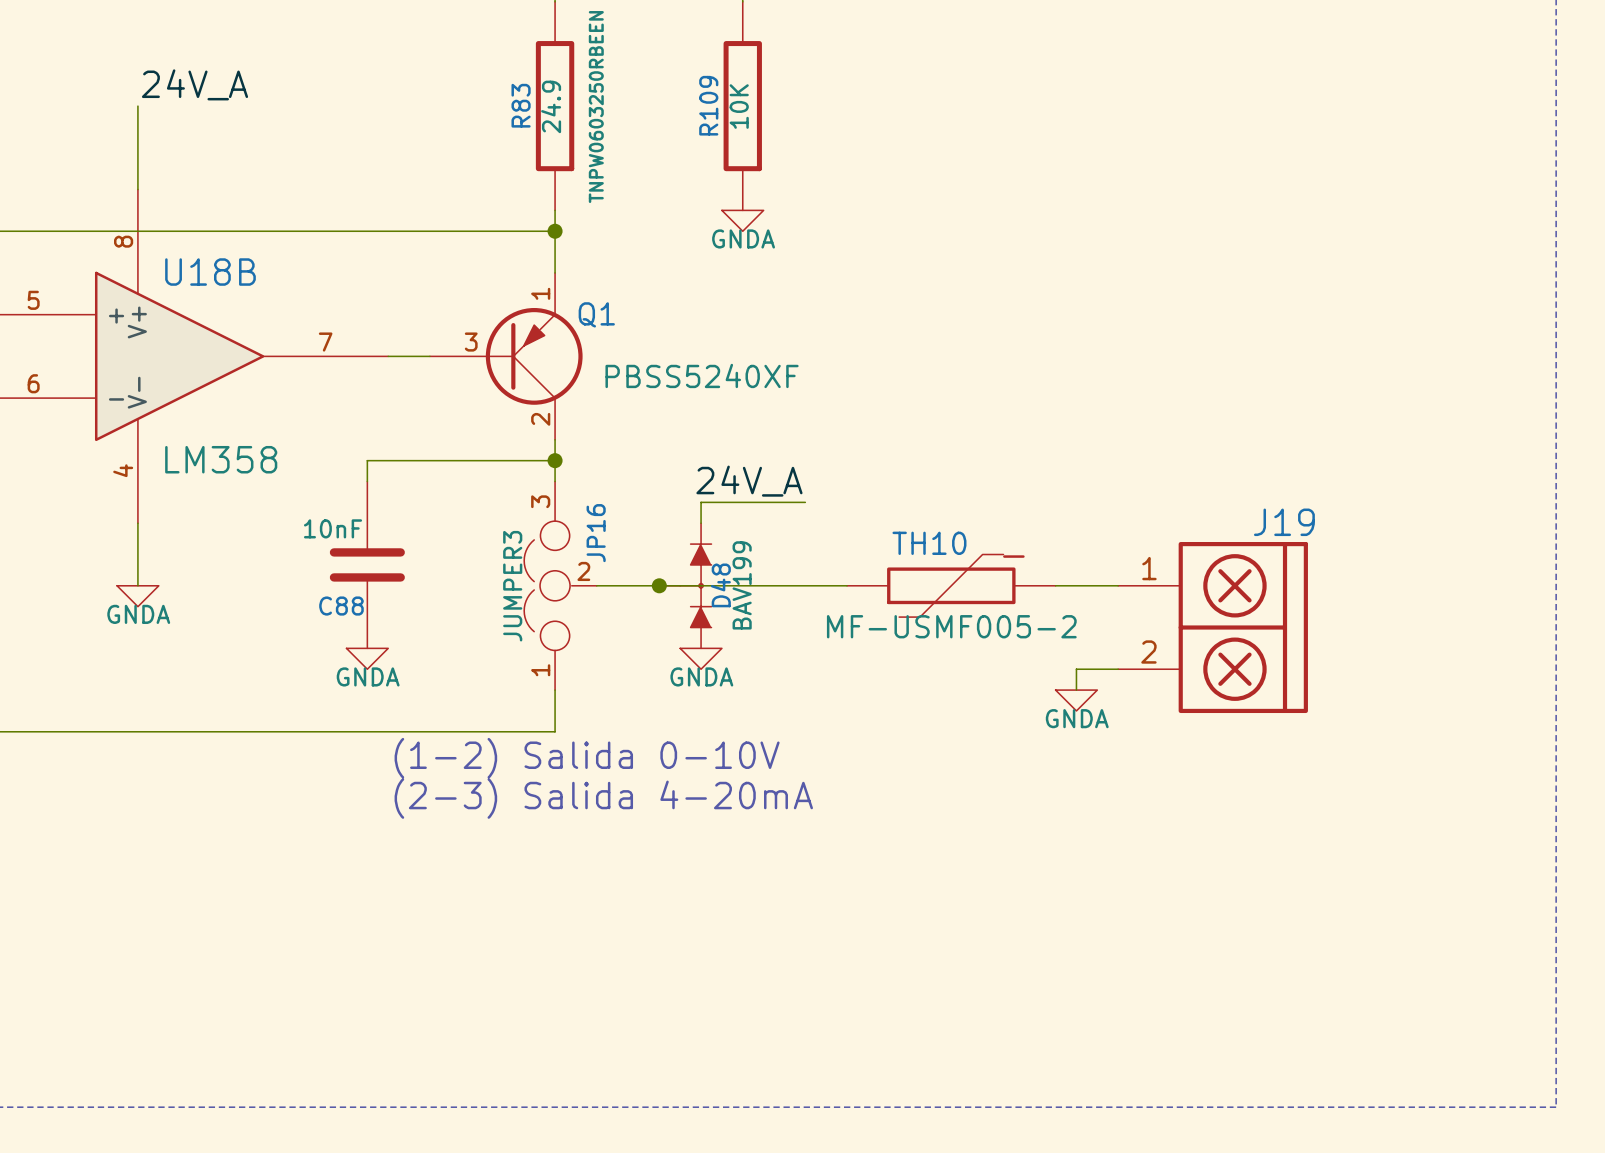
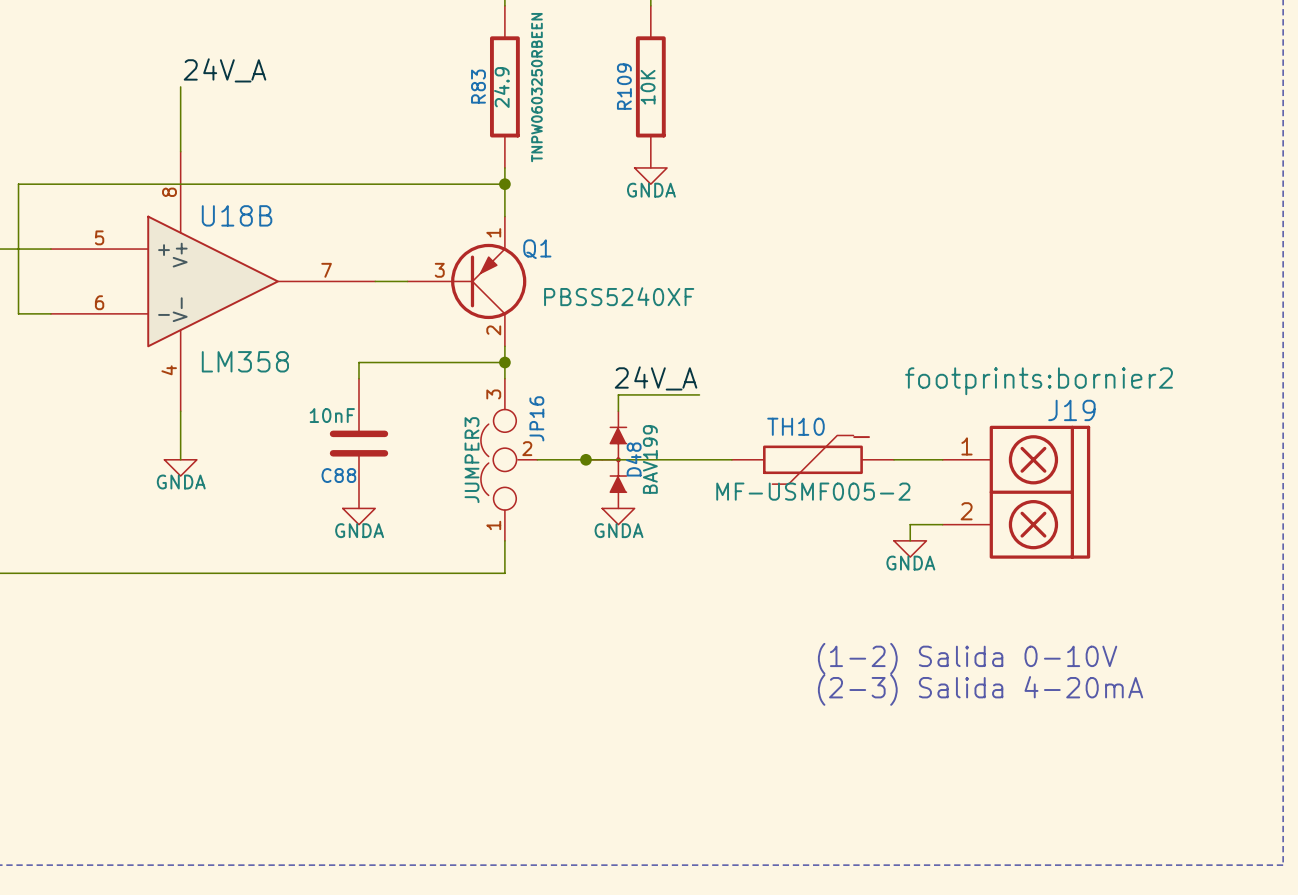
J19 text: none -> footprints:bornier2 (1039, 381)
text: (1-2) Salida 0-10V (587, 758) -> none
text: (2-3) Salida 4-20mA (603, 798) -> none
text: none -> (1-2) Salida 0-10V (967, 658)
text: none -> (2-3) Salida 4-20mA (980, 690)

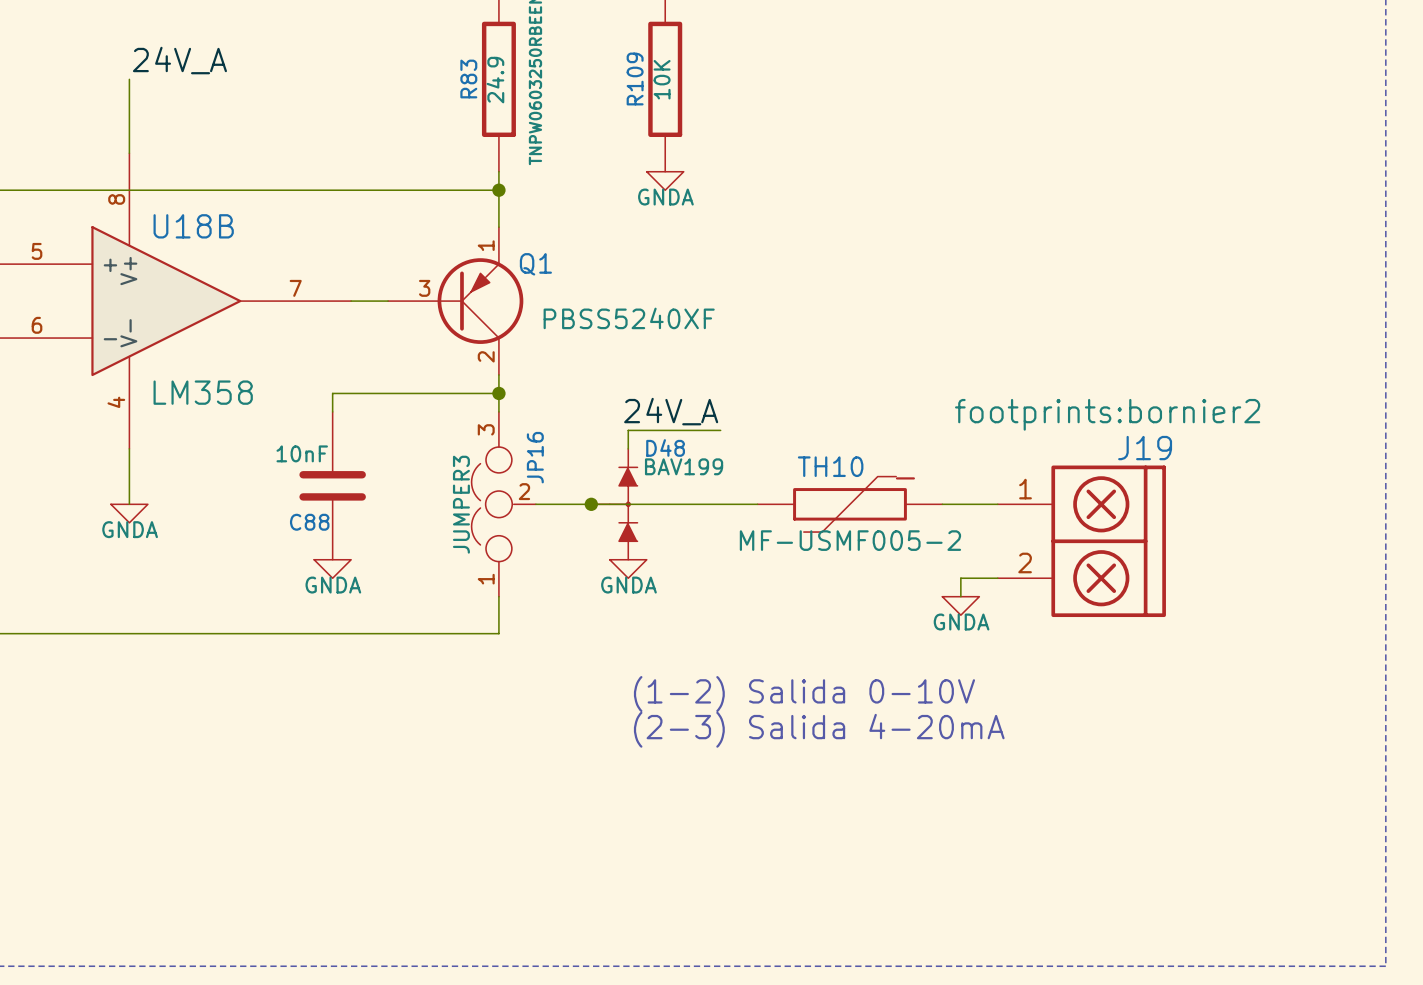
D48 name rotation: 0° (633, 459) -> 90° clockwise (665, 447)
D48 name position: D48 (633, 459) -> D48 (665, 447)
D48 value rotation: 0° (650, 459) -> 90° clockwise (684, 466)
text position: (1-2) Salida 0-10V (967, 658) -> (1-2) Salida 0-10V (804, 694)
text position: (2-3) Salida 4-20mA (980, 690) -> (2-3) Salida 4-20mA (819, 729)

